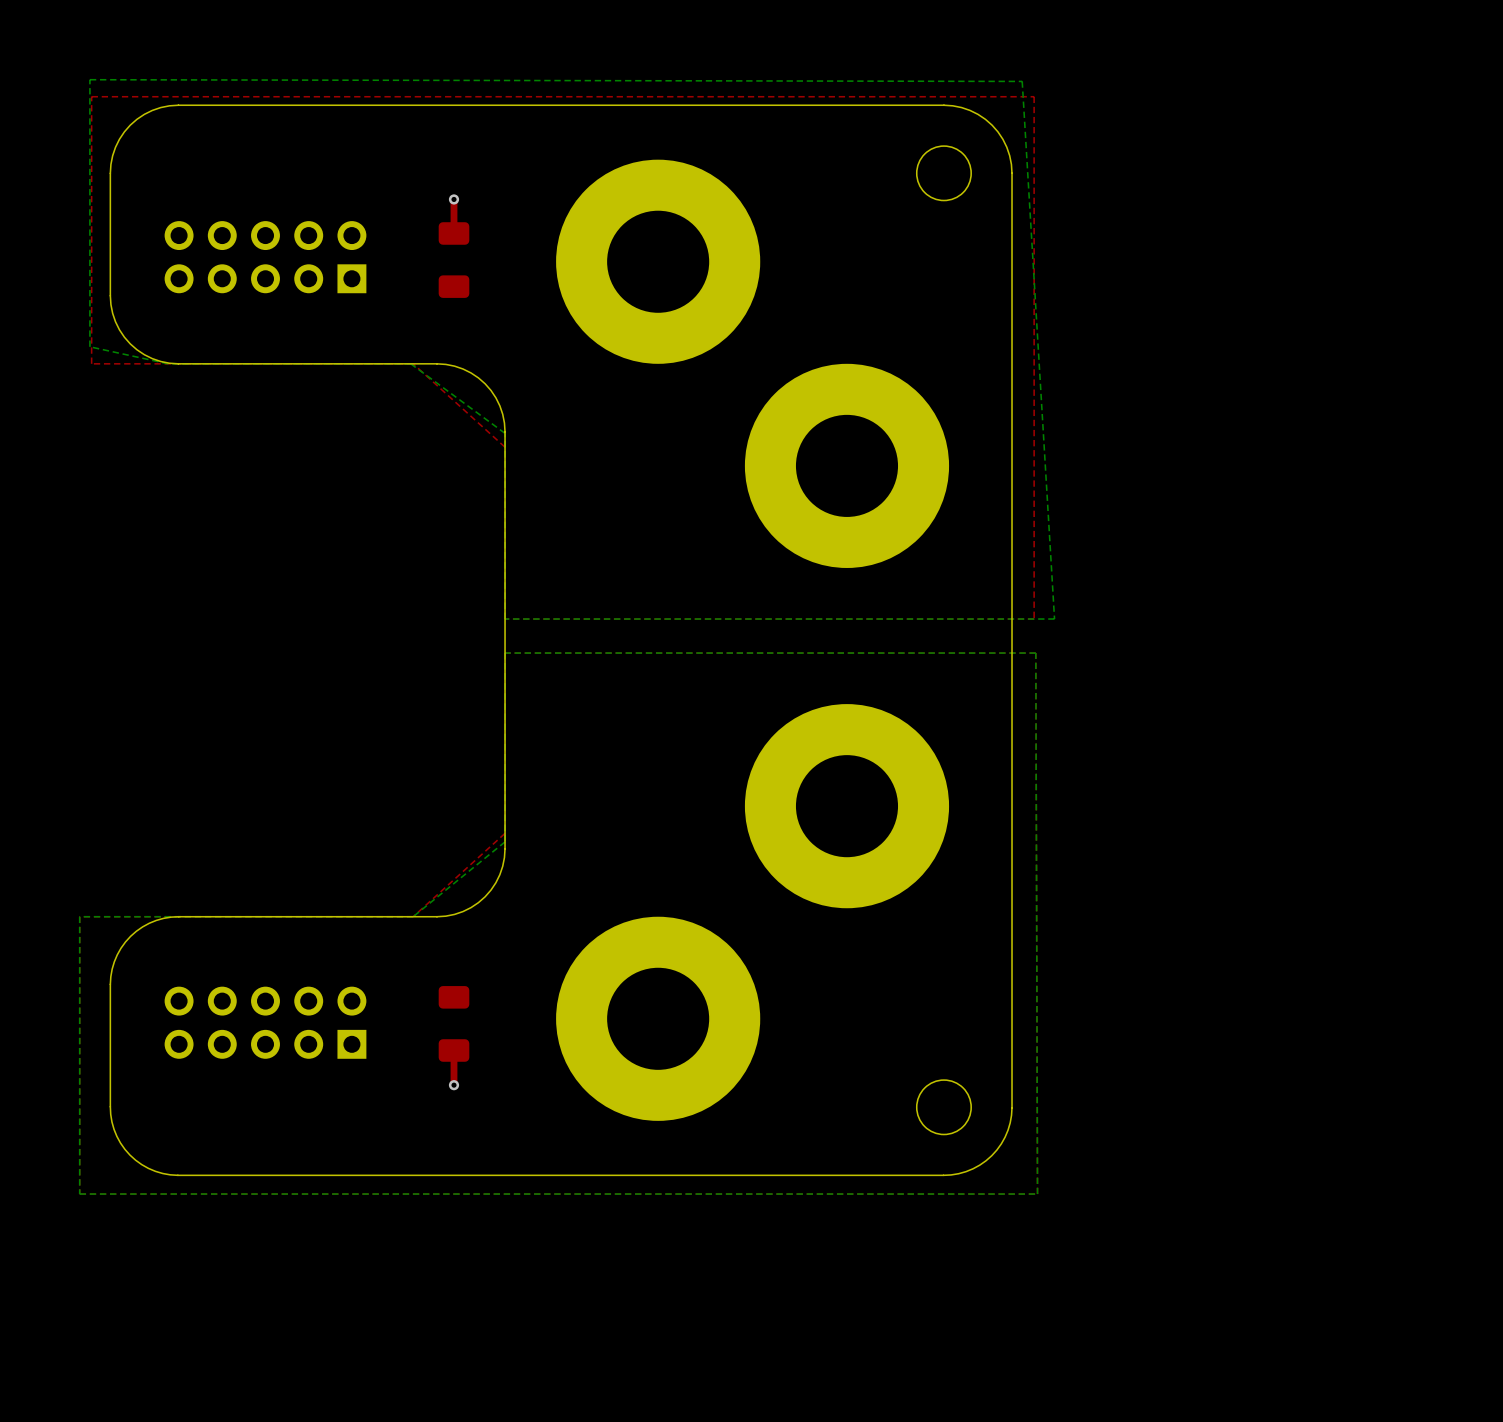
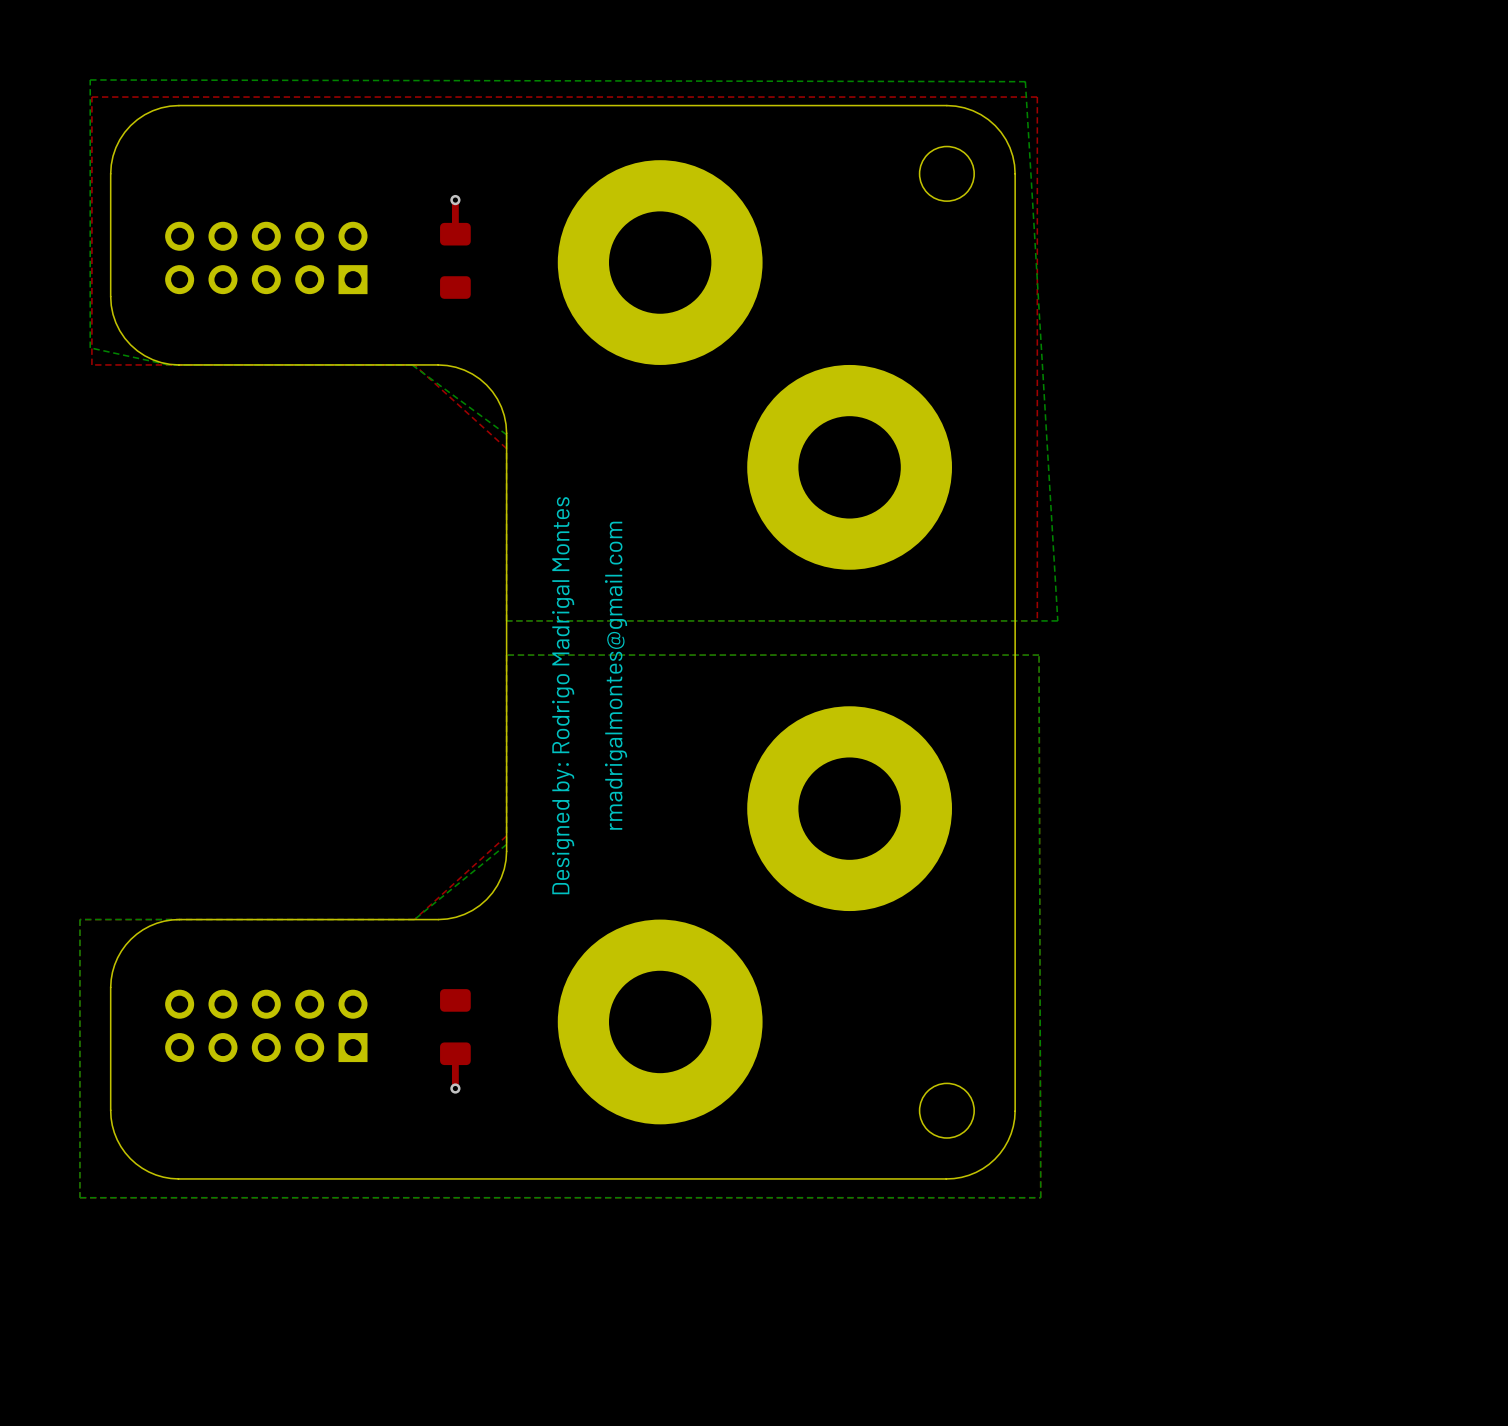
text: none -> rmadrigalmontes@gmail.com (616, 675)
text: none -> Designed by: Rodrigo Madrigal Montes (563, 695)

